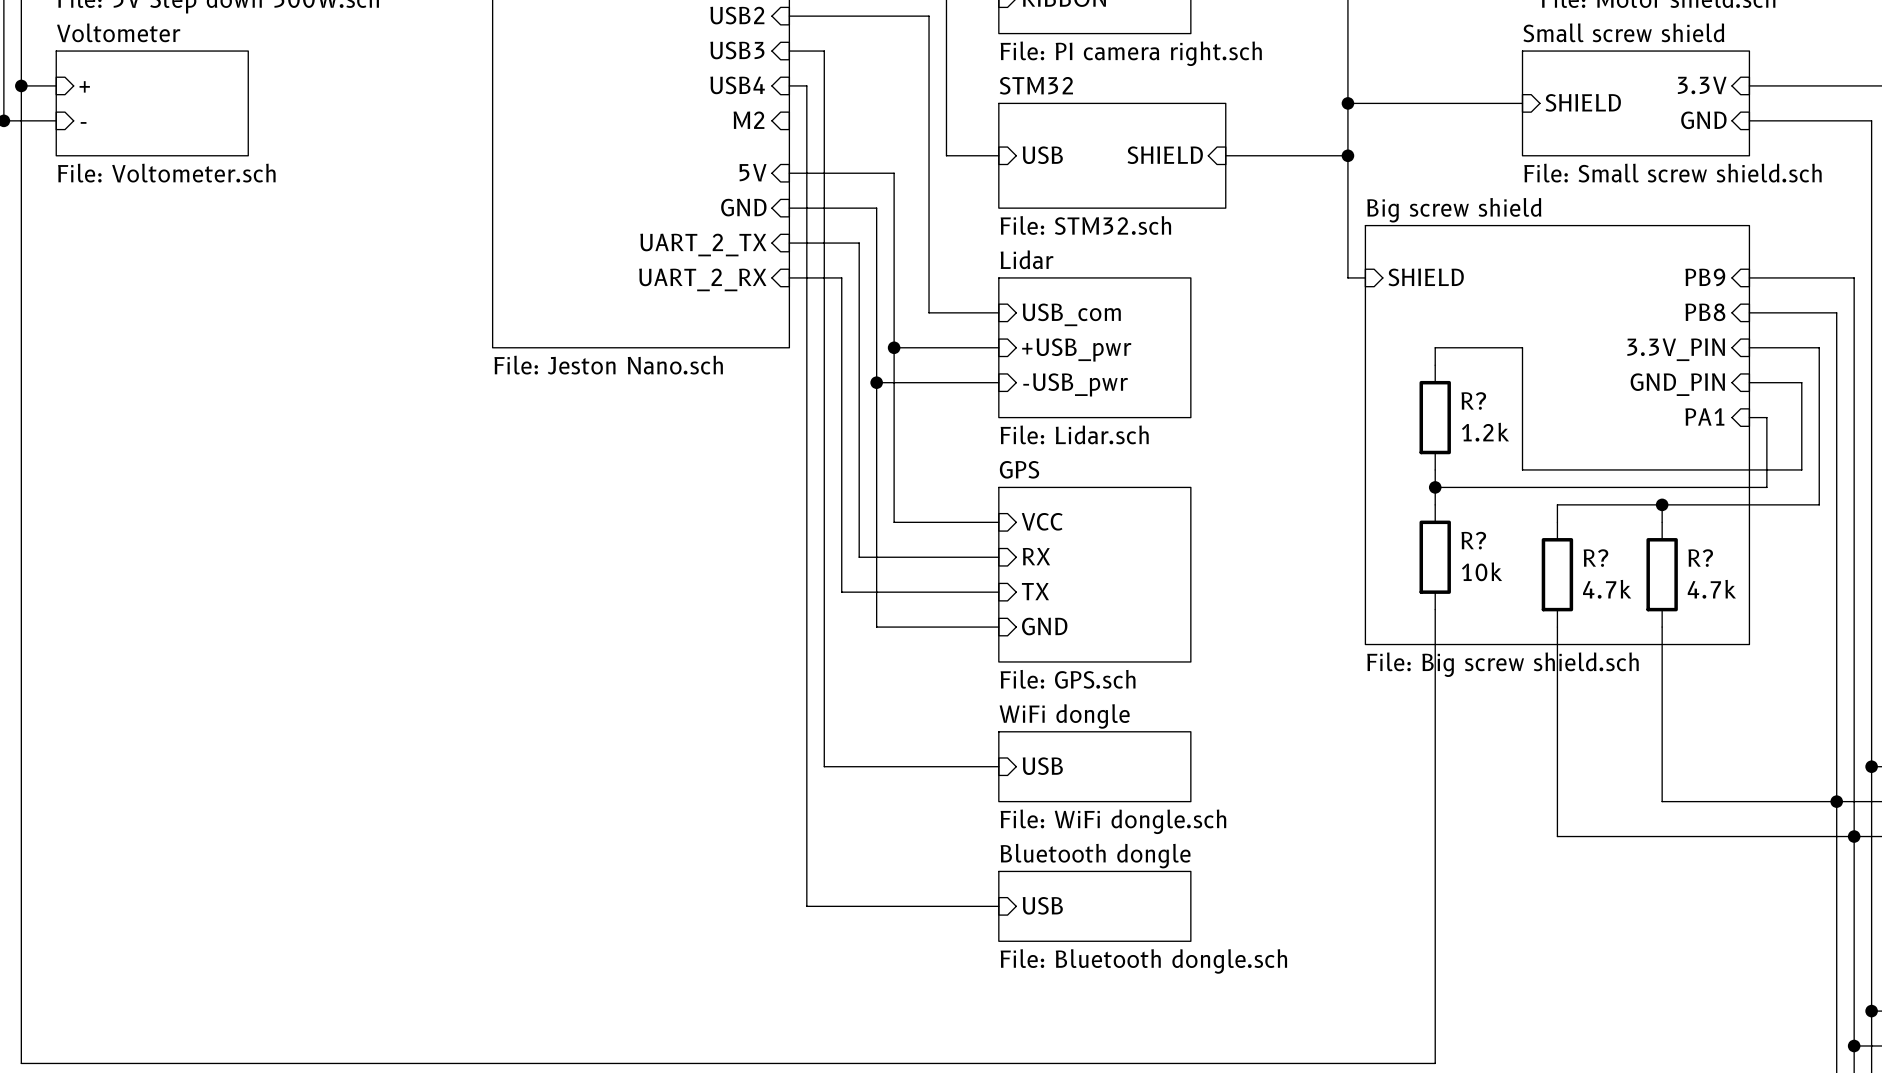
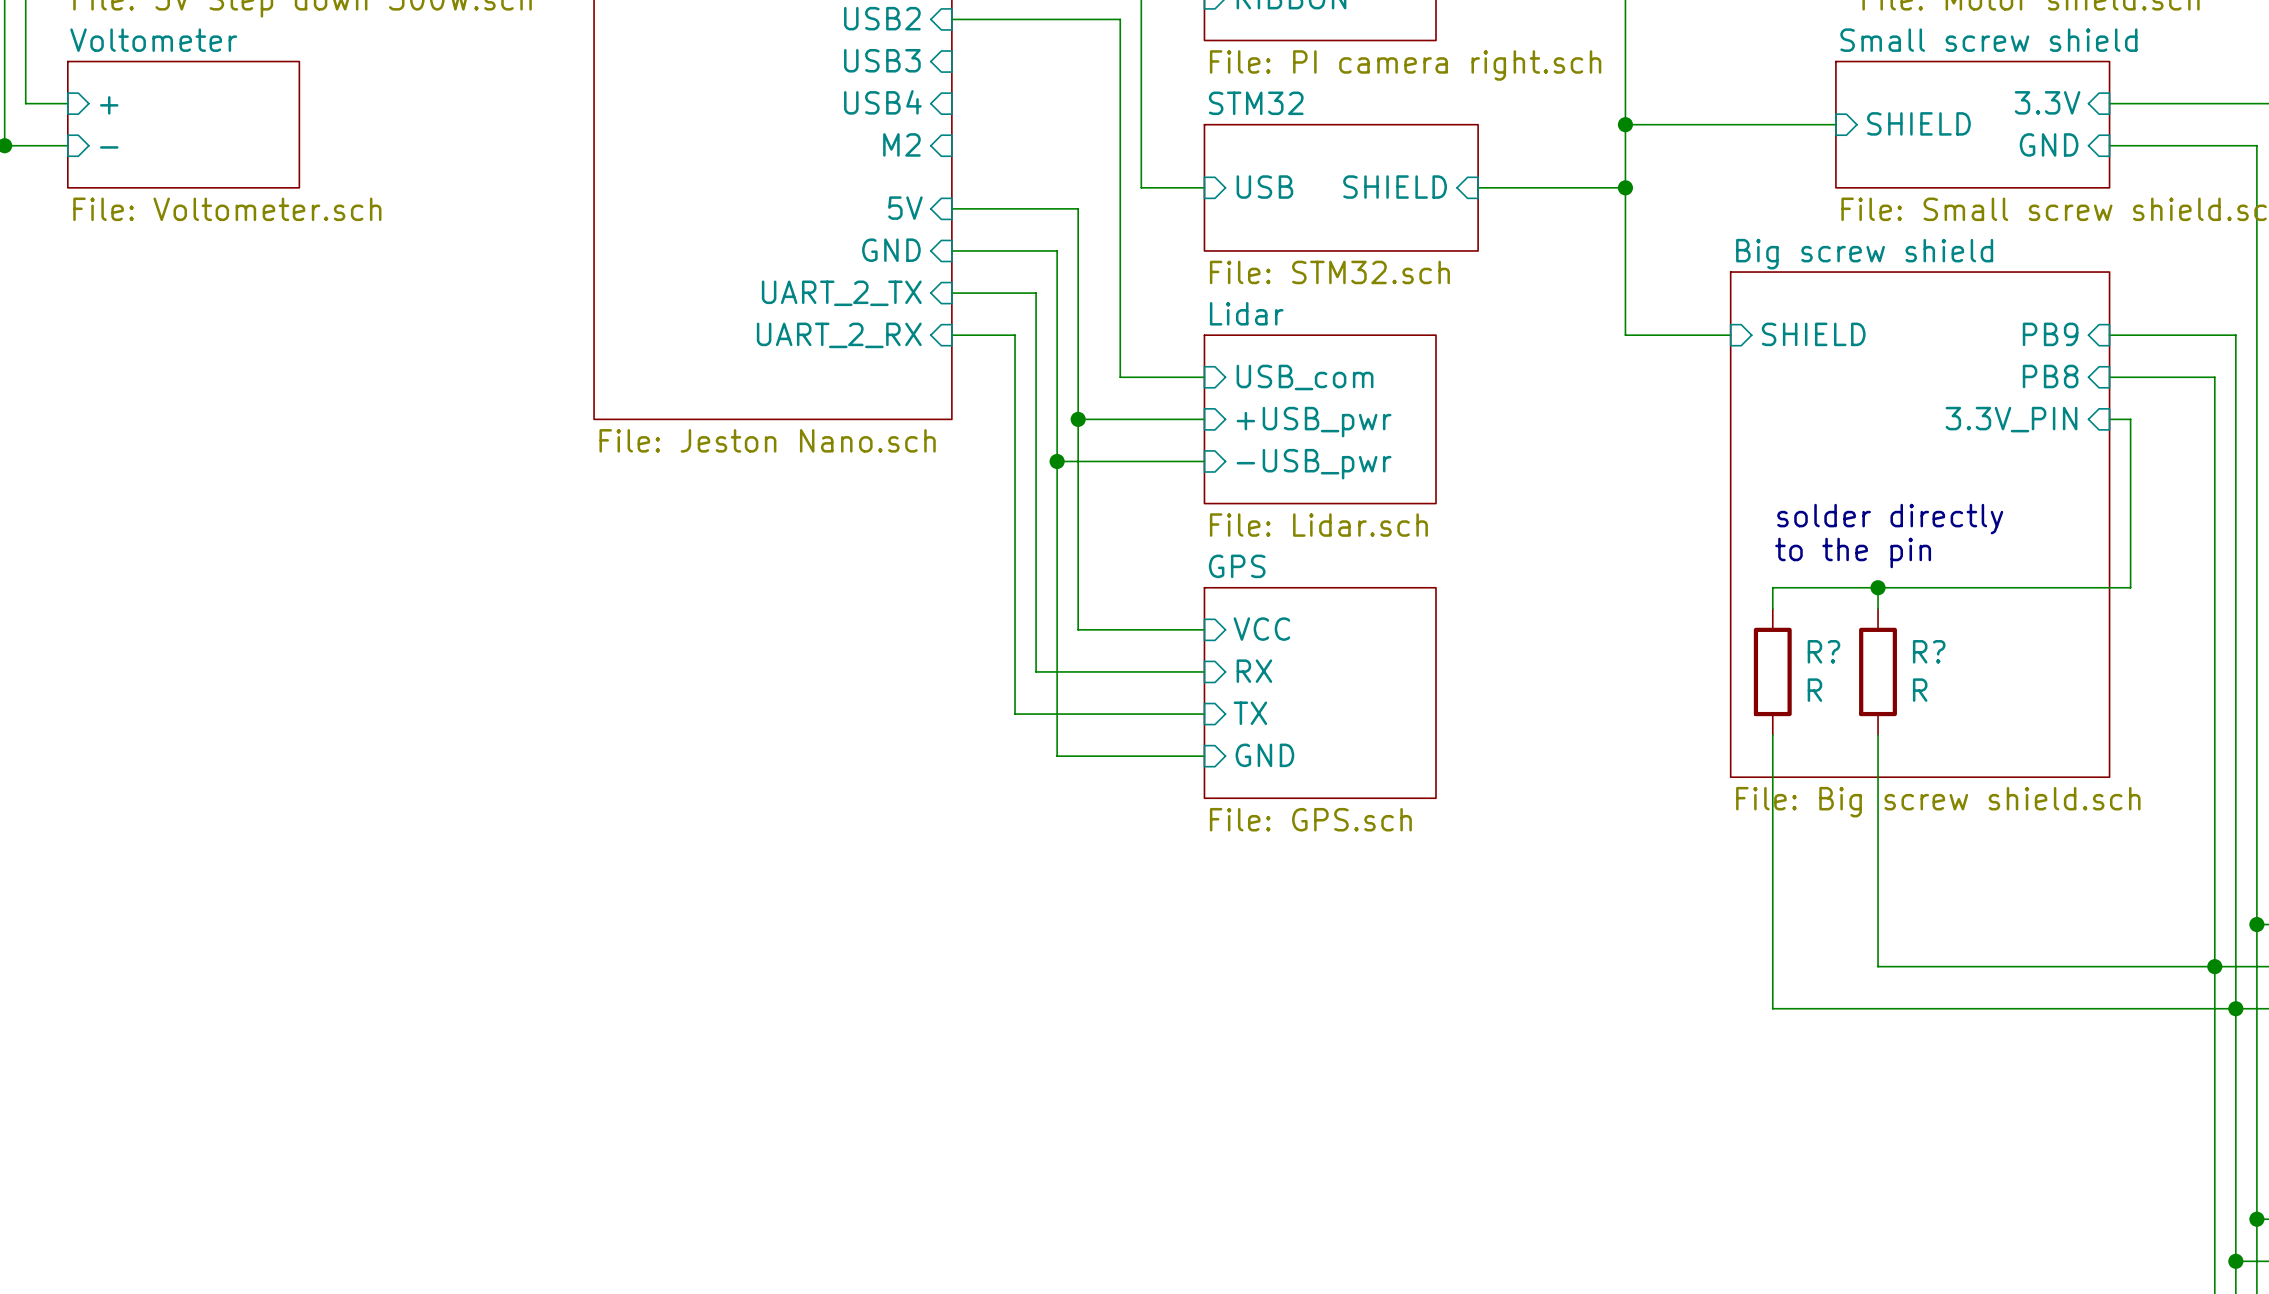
wire: (789, 51) (824, 51) (824, 766) (998, 766) -> none
wire: (21, 85) (21, 1063) (1435, 1063) (1435, 609) -> none
junction: (21, 85) -> none
wire: (789, 85) (806, 85) (806, 906) (998, 906) -> none
wire: none -> (1646, 335) (1730, 335)
sheet pin position: SHIELD (1426, 277) -> SHIELD (1813, 334)
wire: (1766, 347) (1819, 347) (1819, 504) (1557, 504) (1557, 522) -> none
wire: (1435, 365) (1435, 347) (1522, 347) (1522, 469) (1801, 469) (1801, 382) (1749, 382) -> none
sheet pin: GND_PIN (1677, 384) -> none
sheet pin: PA1 (1704, 416) -> none
R?: 1.2k (1435, 417) -> none
wire: (1749, 417) (1766, 417) -> (2130, 419) (2130, 503)
text: none -> solder directly (1890, 519)
sheet Big screw shield: File: Big screw shield.sch (1557, 435) -> none
sheet Big screw shield: none -> File: Big screw shield.sch (1920, 524)
text: none -> to the pin (1853, 552)
wire: (1435, 487) (1470, 487) -> (1772, 608) (1772, 587)
junction: (1435, 487) -> none
junction: none -> (1878, 587)
wire: (1662, 504) (1662, 522) -> (1878, 587) (1878, 608)
junction: (1662, 504) -> none
R?: 10k (1435, 557) -> none
R?: none -> R (1772, 671)
R?: none -> R (1878, 671)
R?: 4.7k (1557, 574) -> none
R?: 4.7k (1662, 574) -> none
wire: none -> (1772, 735) (1772, 1008) (1878, 1008)
wire: (1662, 627) (1662, 801) -> none
sheet pin: USB (1042, 766) -> none
sheet WiFi dongle: File: WiFi dongle.sch (1094, 766) -> none
wire: (1557, 801) (1557, 836) -> (1878, 966) (2004, 966)
sheet pin: USB (1042, 905) -> none
sheet Bluetooth dongle: File: Bluetooth dongle.sch (1094, 906) -> none

